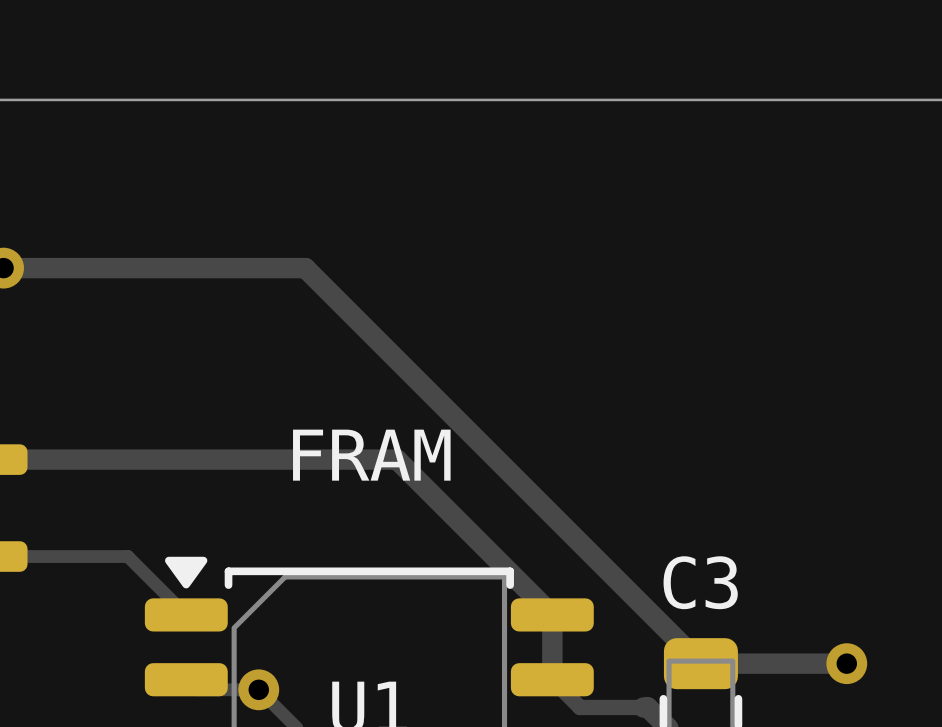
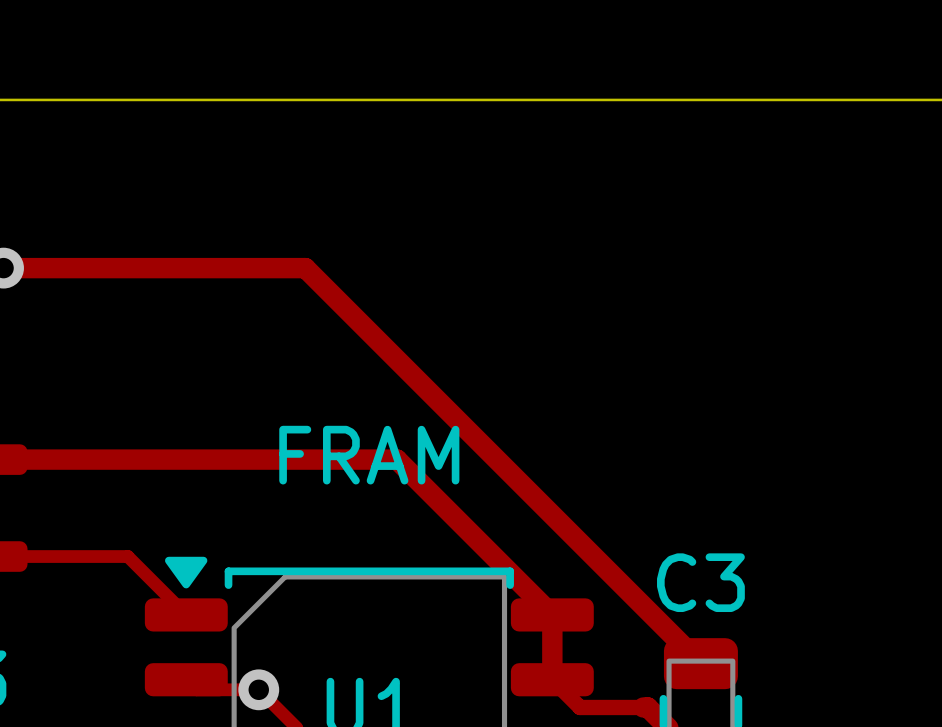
track: (700, 663) (846, 663) -> none
via: (846, 663) -> none

